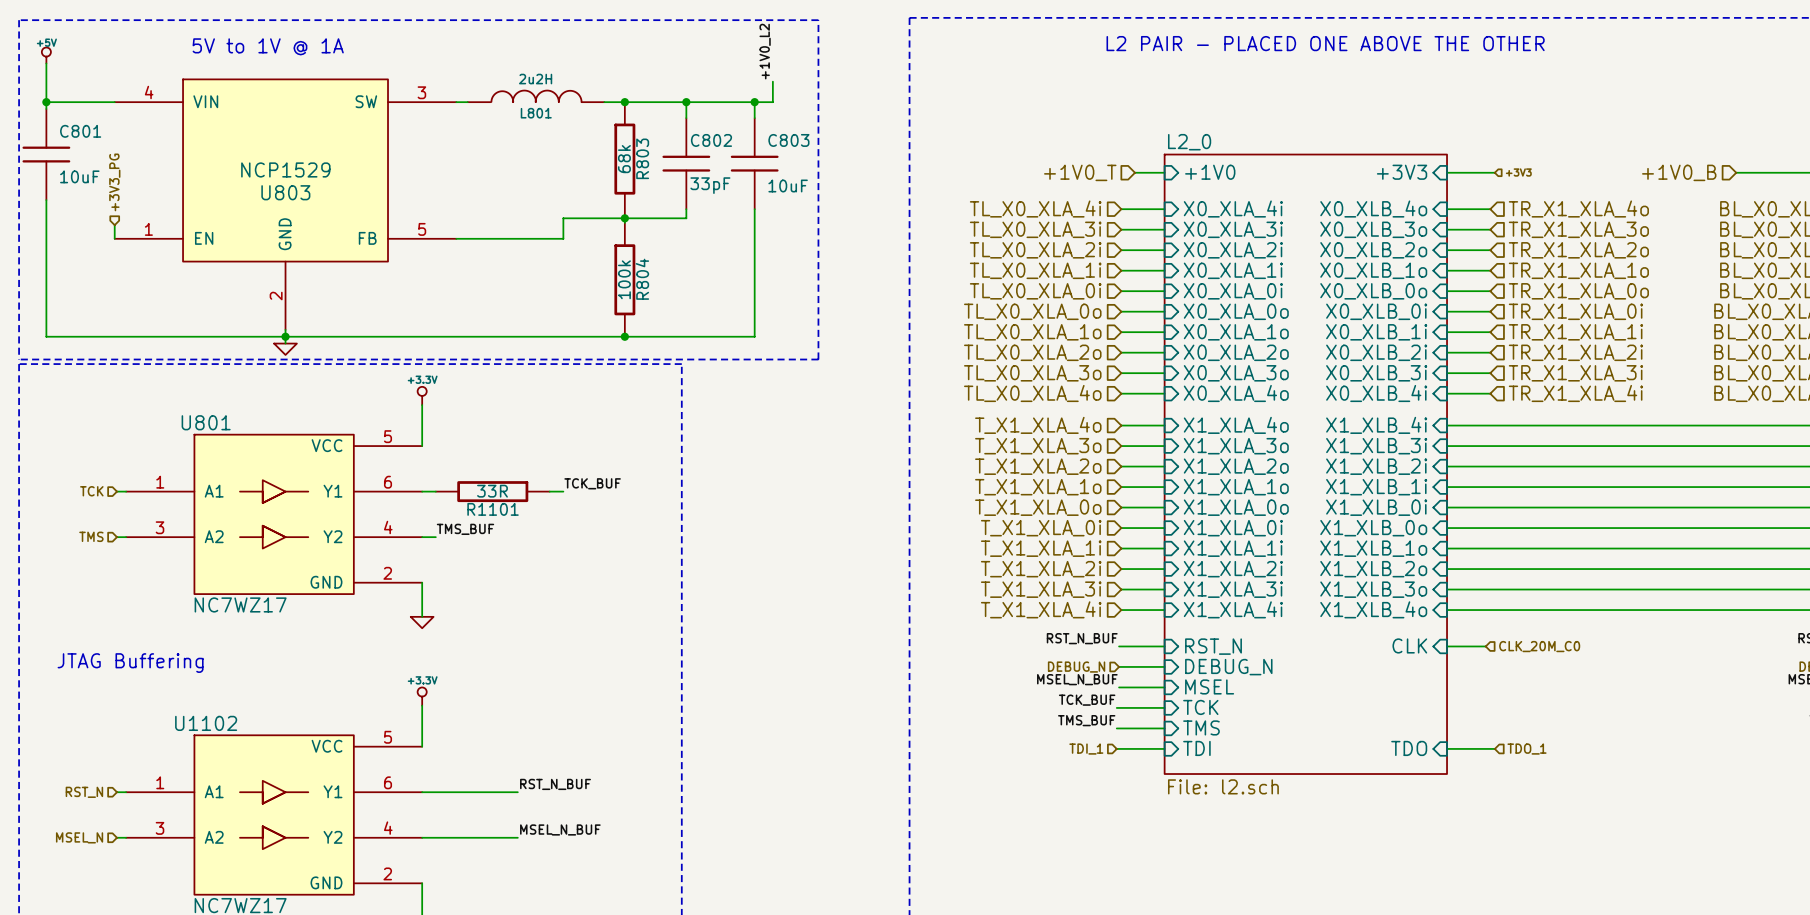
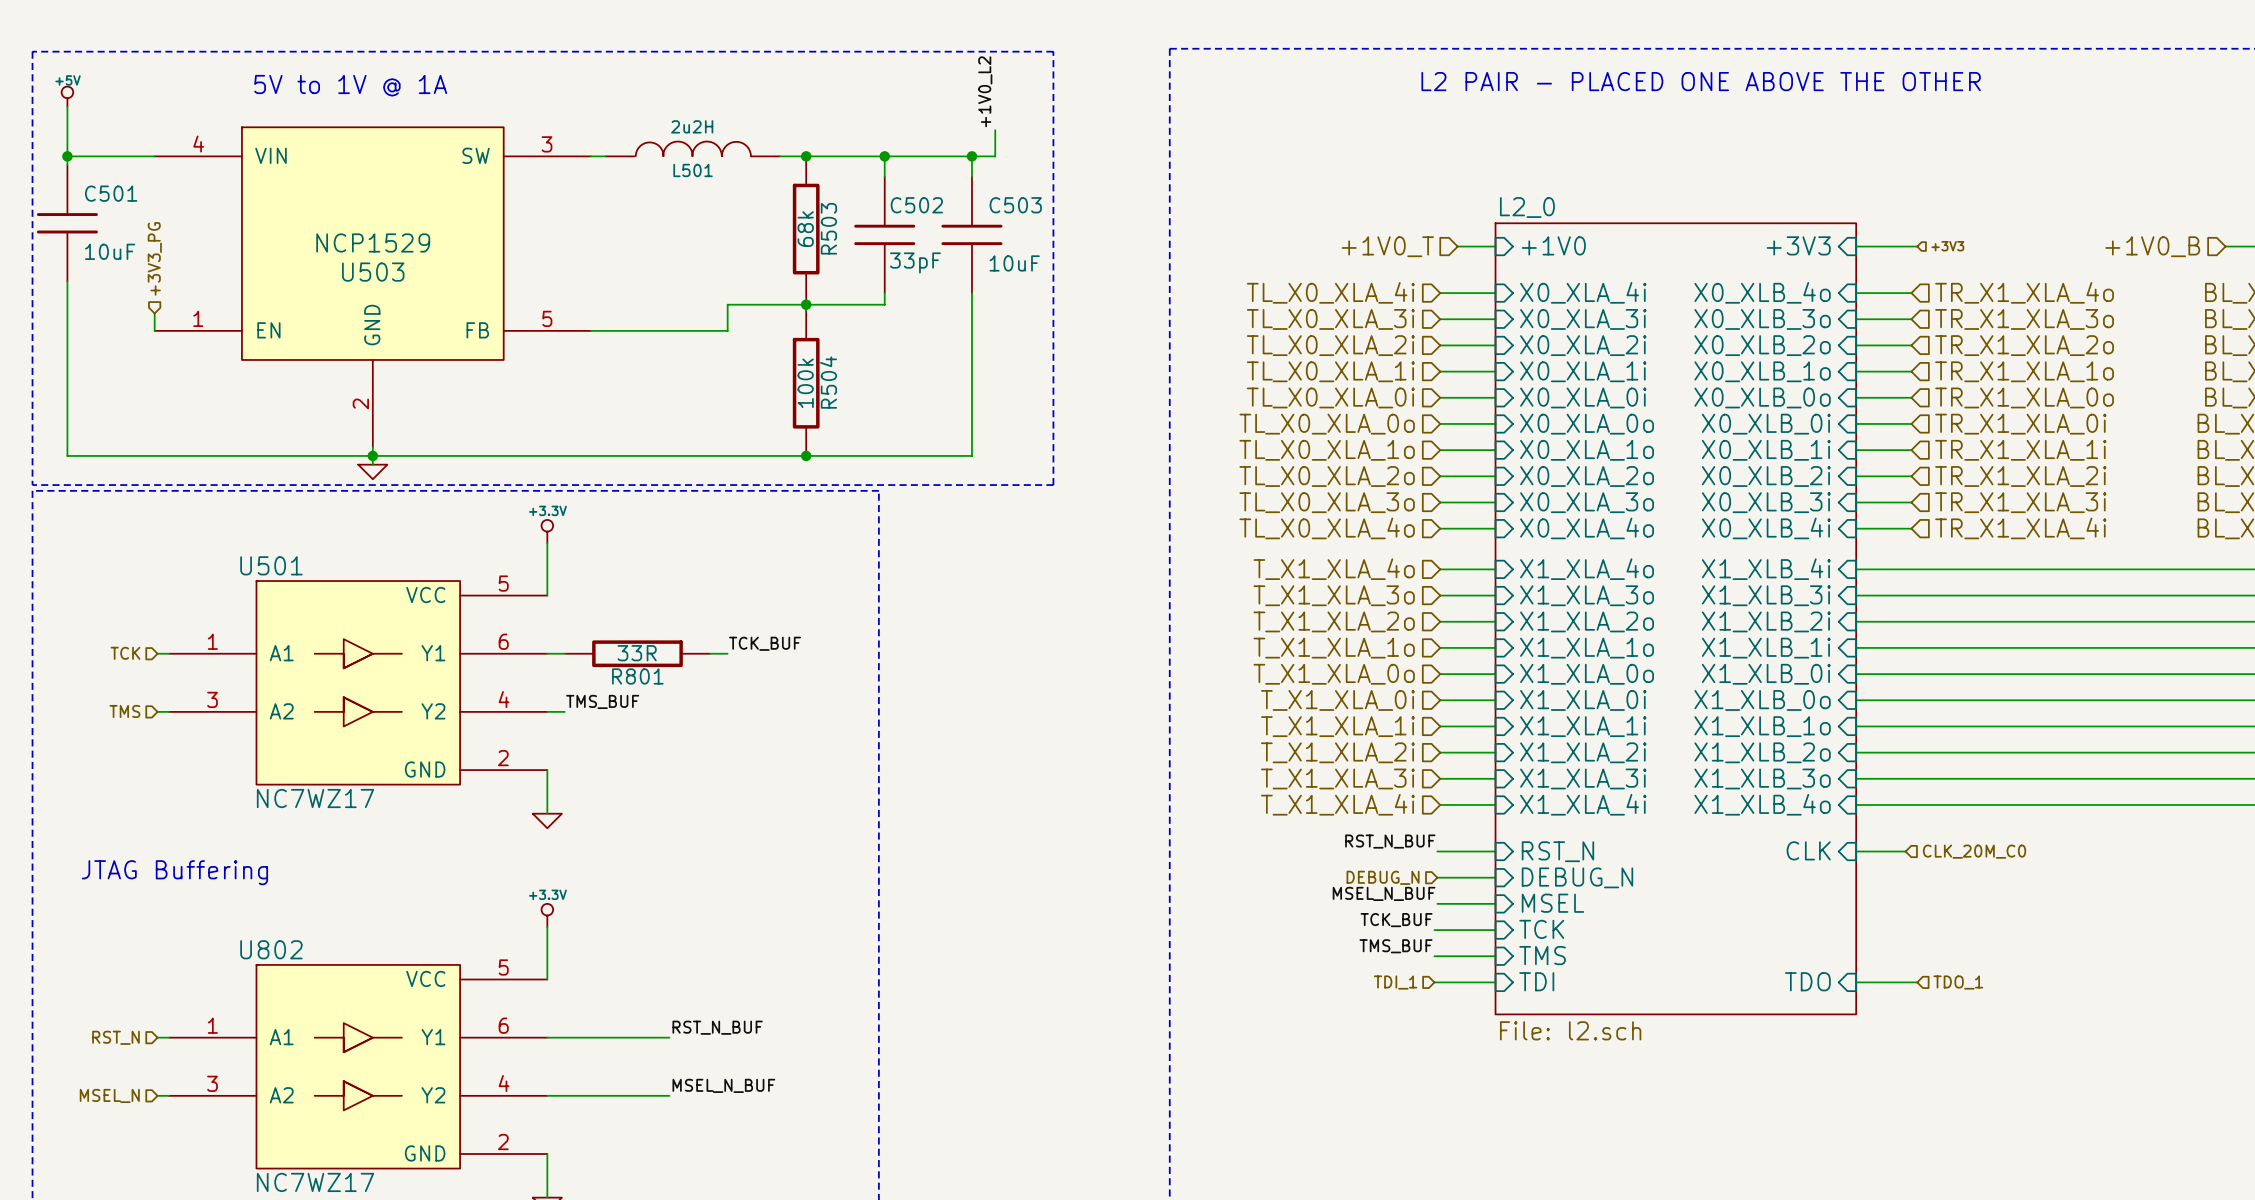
L801 name: L801 (536, 113) -> L501 (693, 170)
C801 name: C801 (80, 131) -> C501 (111, 193)
C802 name: C802 (711, 140) -> C502 (916, 205)
C803 name: C803 (788, 140) -> C503 (1015, 205)
R803 name: R803 (642, 158) -> R503 (828, 228)
U803 name: U803 (285, 192) -> U503 (373, 272)
R804 name: R804 (642, 279) -> R504 (828, 382)
U801 name: U801 (206, 422) -> U501 (271, 565)
R1101 name: R1101 (493, 509) -> R801 (637, 676)
U1102 name: U1102 (206, 723) -> U802 (271, 949)

